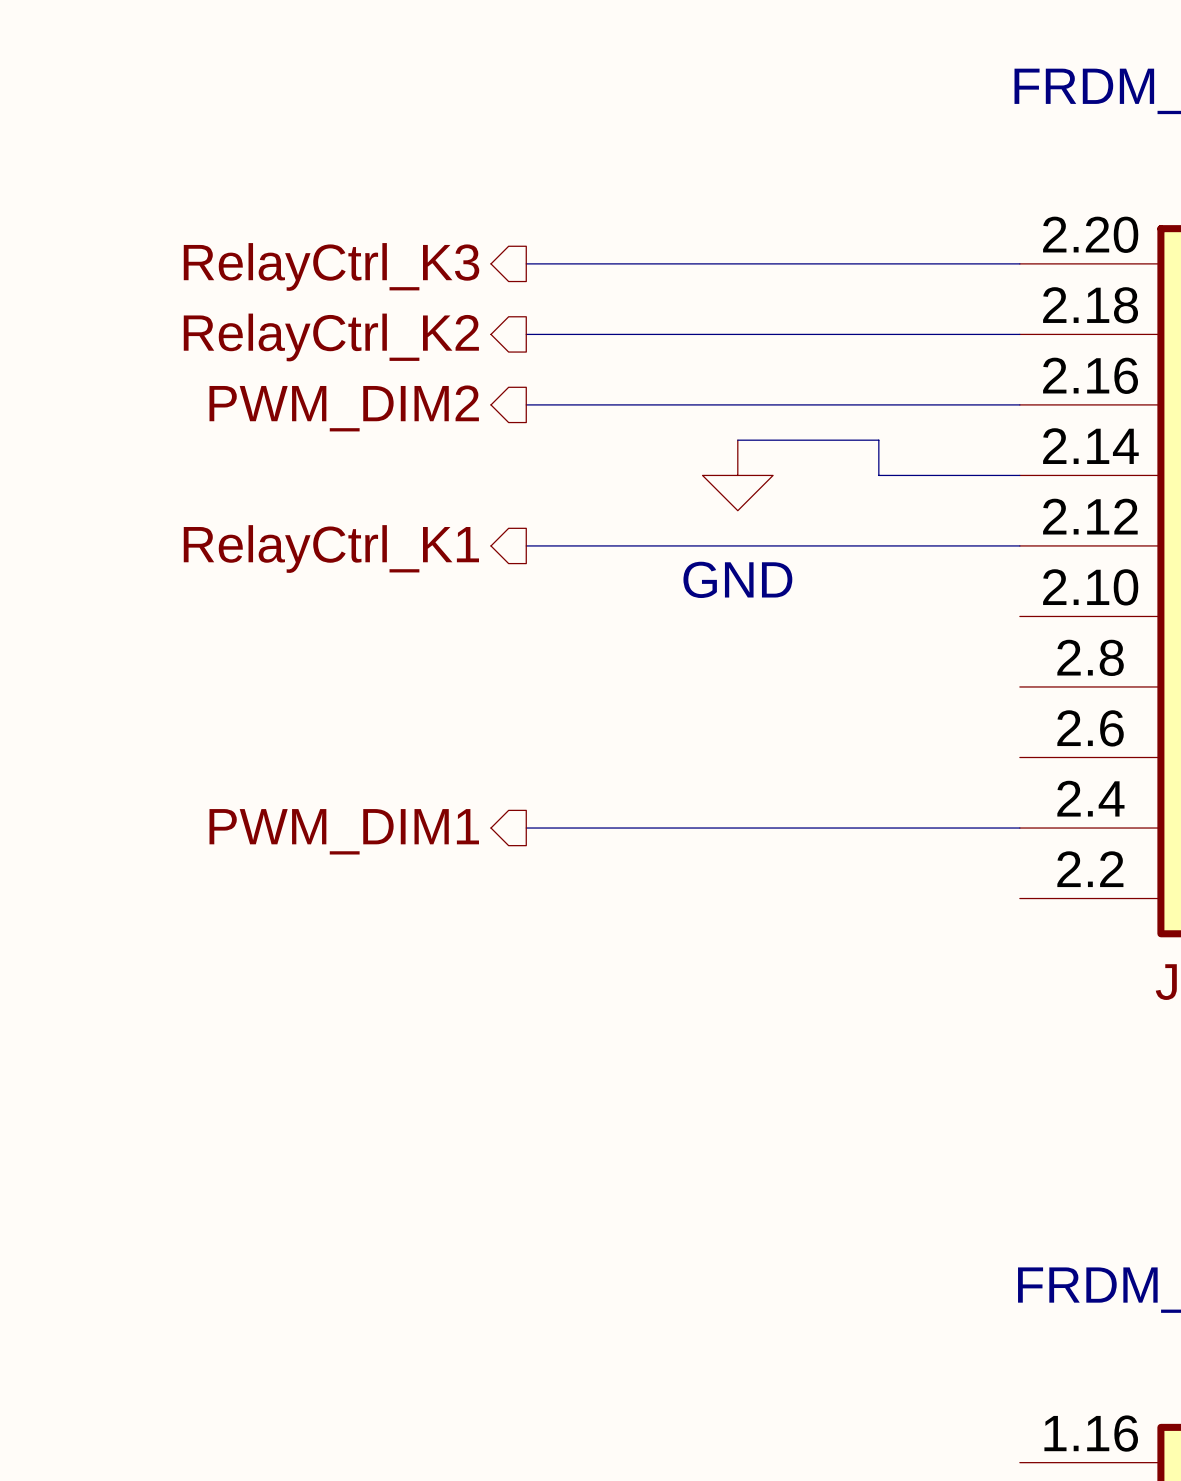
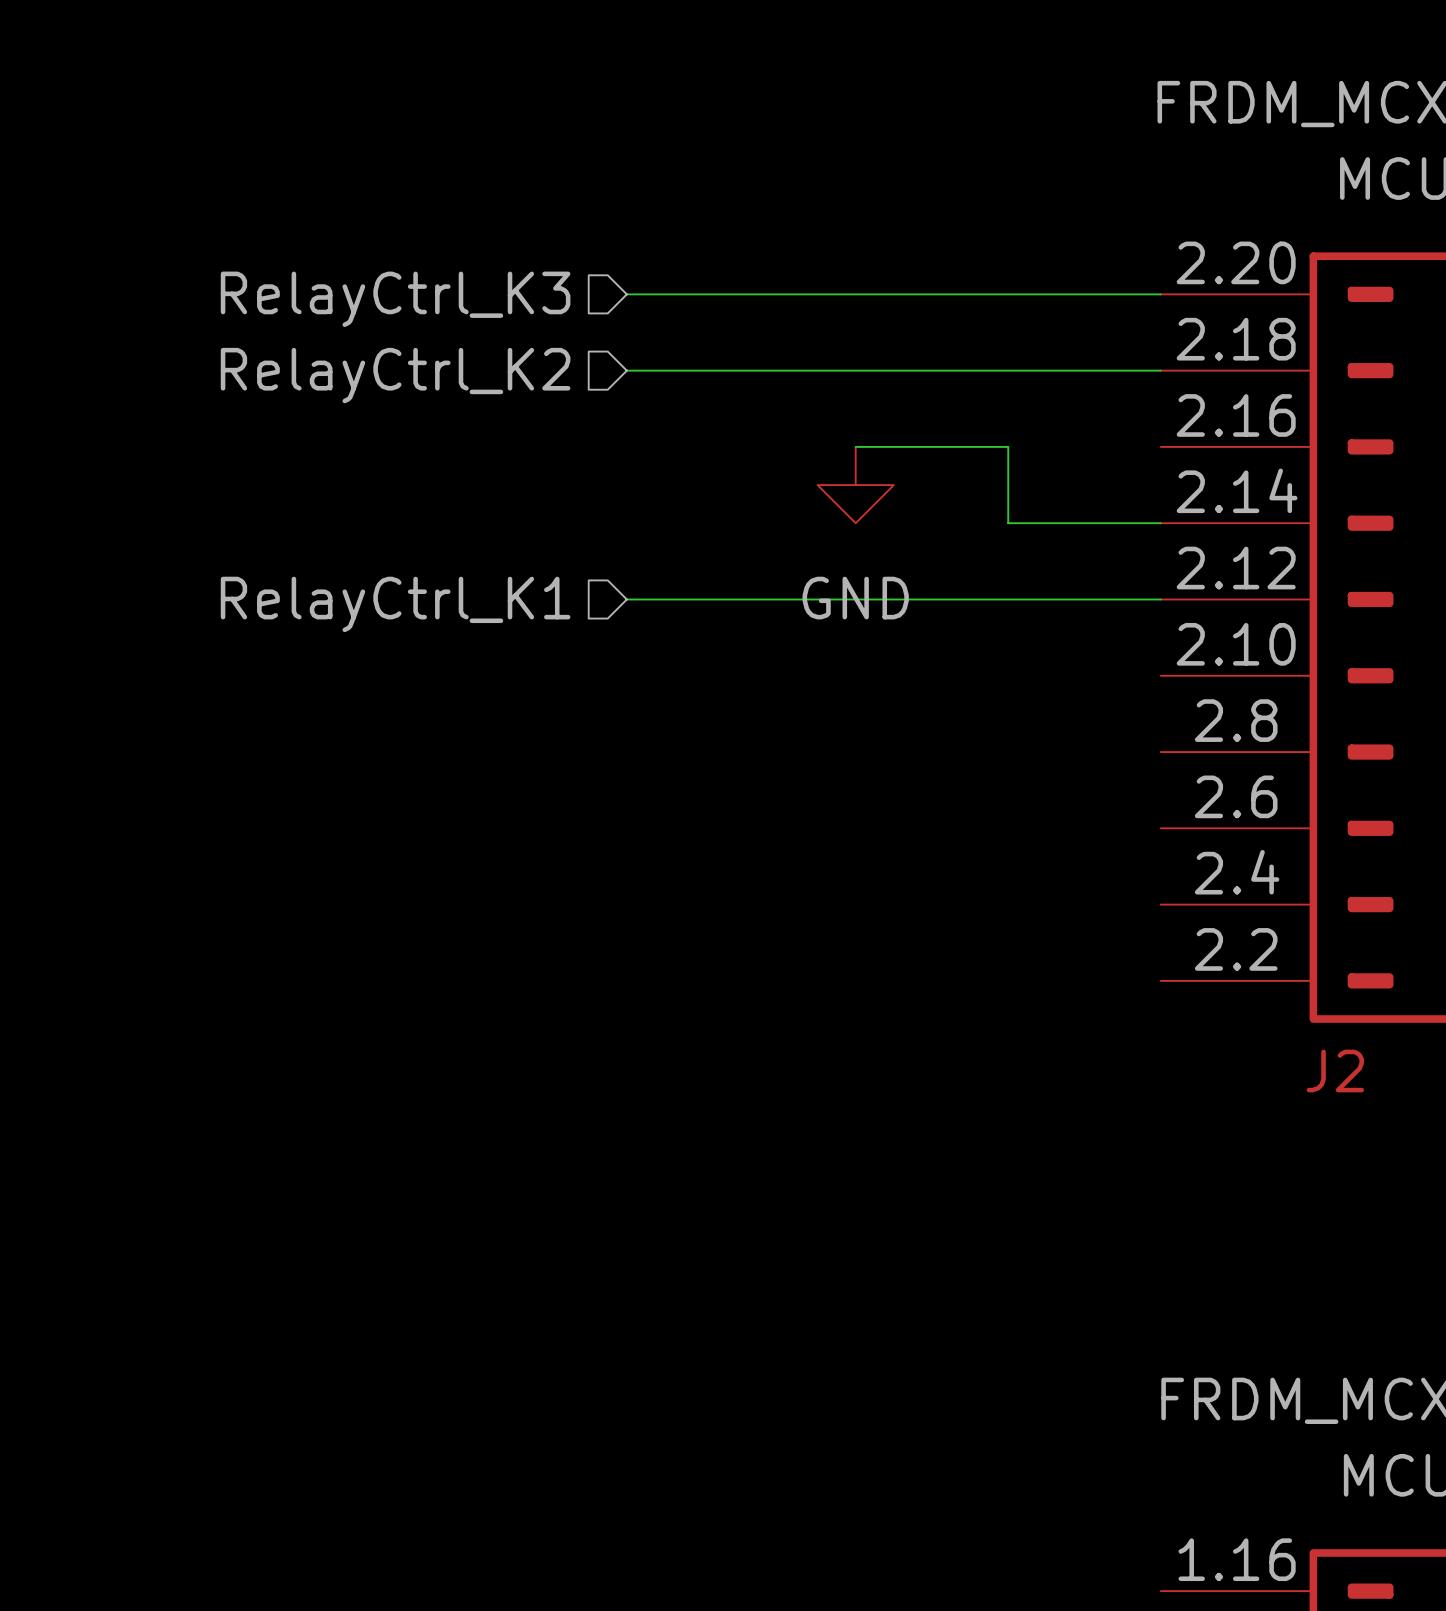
hierarchical label shape: output (331, 266) -> input (395, 299)
hierarchical label shape: output (331, 337) -> input (395, 375)
wire: (526, 404) (737, 404) -> none
wire: (878, 404) (1019, 404) -> (1008, 446) (1008, 485)
hierarchical label: PWM_DIM2 (344, 408) -> none
wire: (737, 440) (878, 440) -> none
power symbol position: GND (737, 475) -> GND (855, 485)
hierarchical label shape: output (331, 549) -> input (395, 604)
wire: (526, 828) (1019, 828) -> none
hierarchical label: PWM_DIM1 (344, 831) -> none

